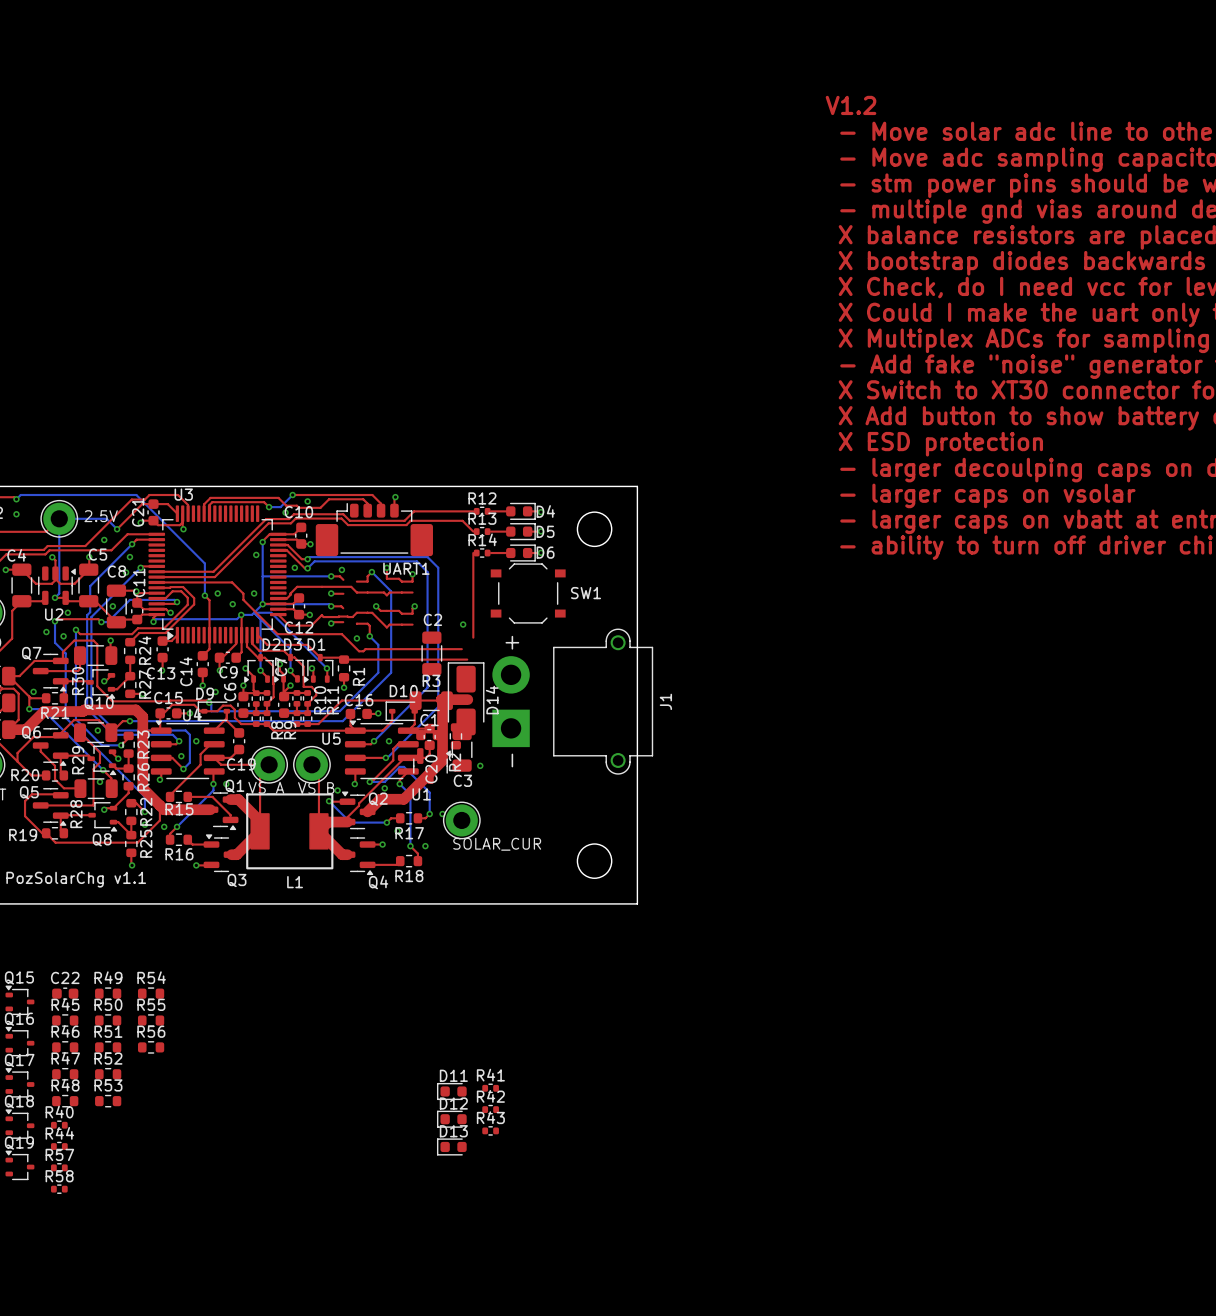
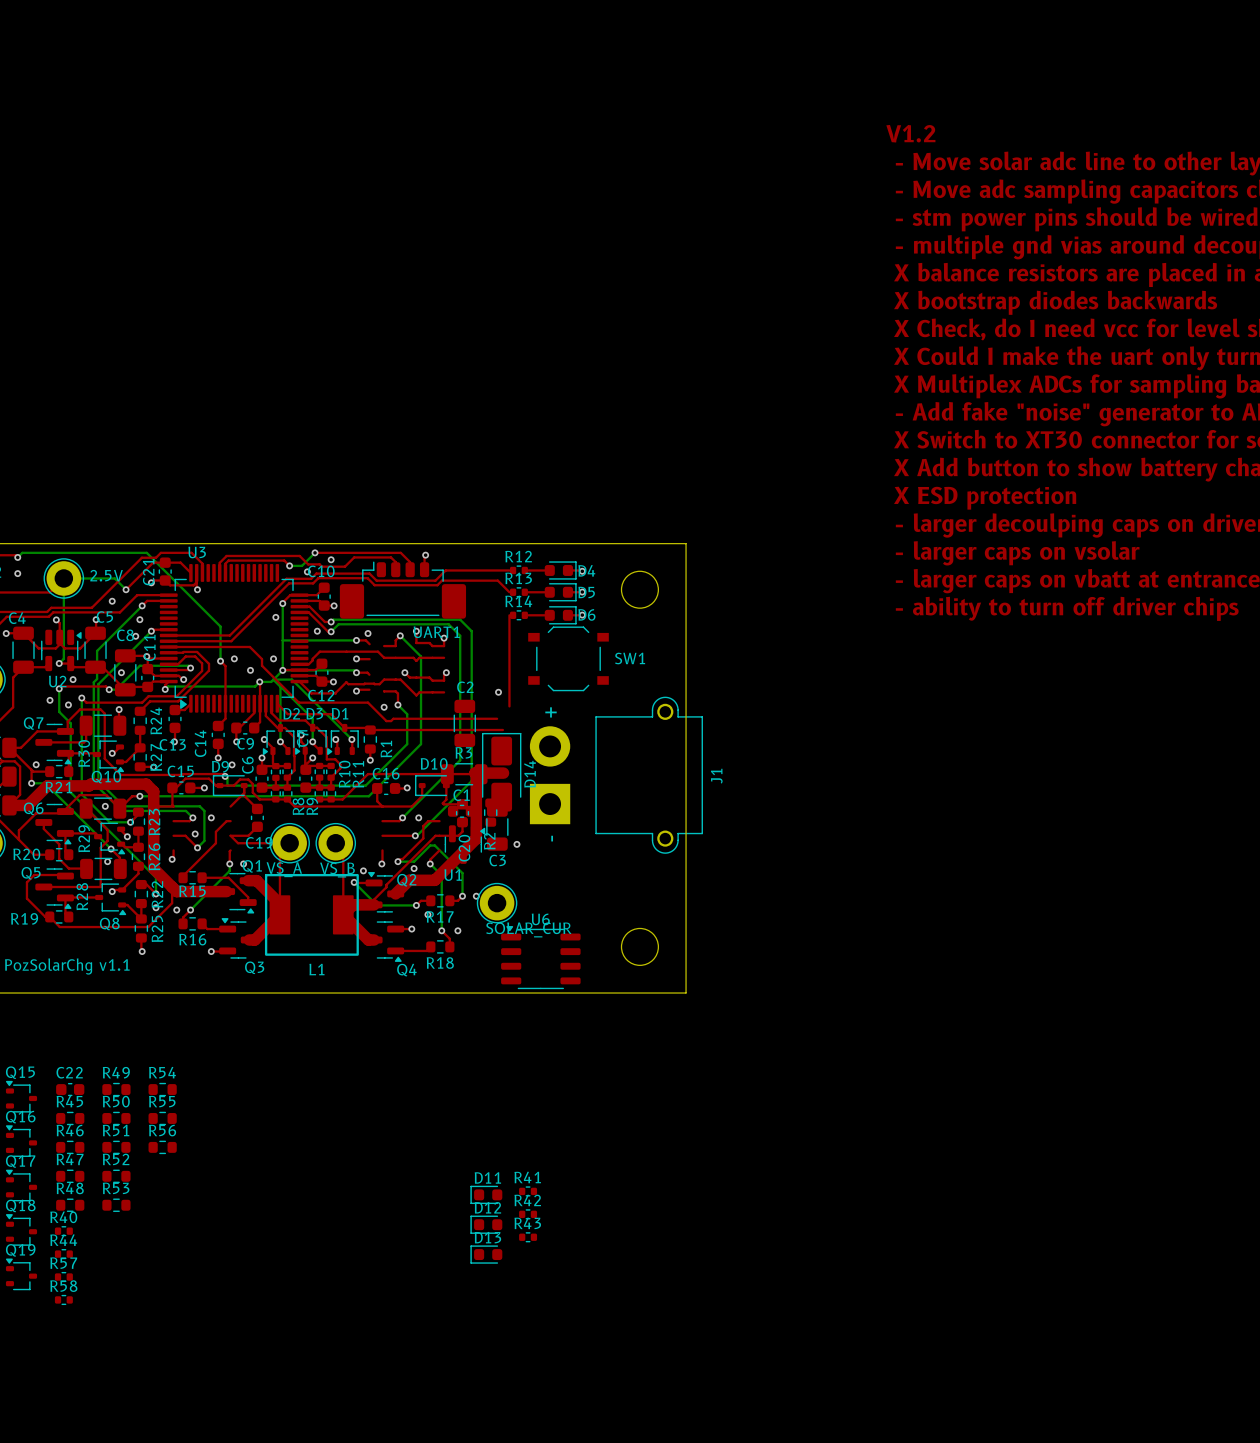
U4: (187, 749) -> none
U5: (381, 749) -> none
U6: none -> (540, 957)

